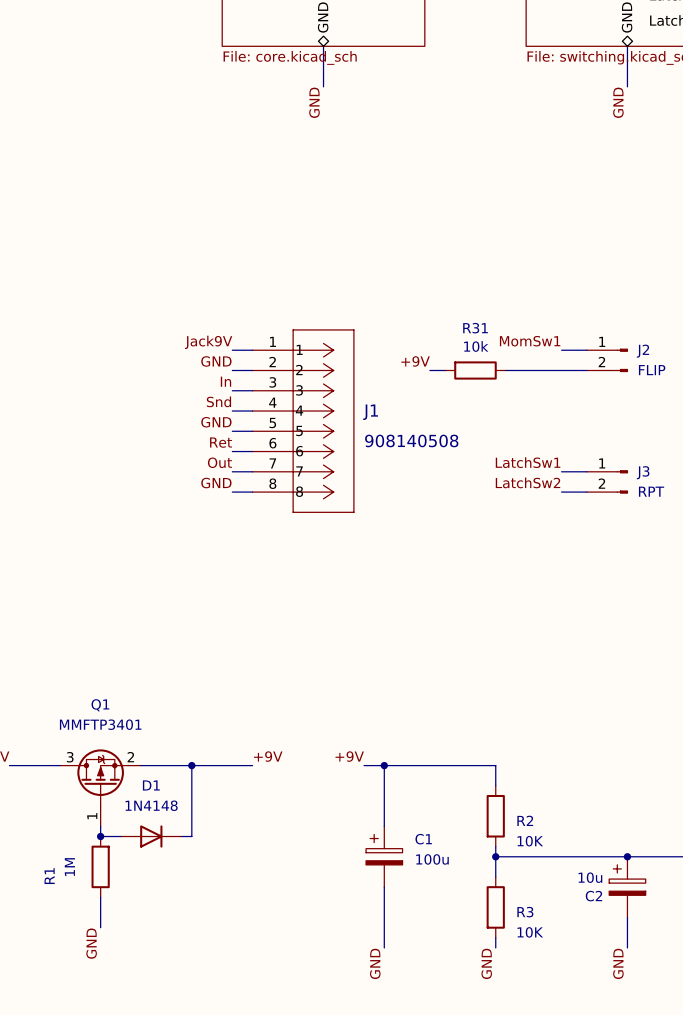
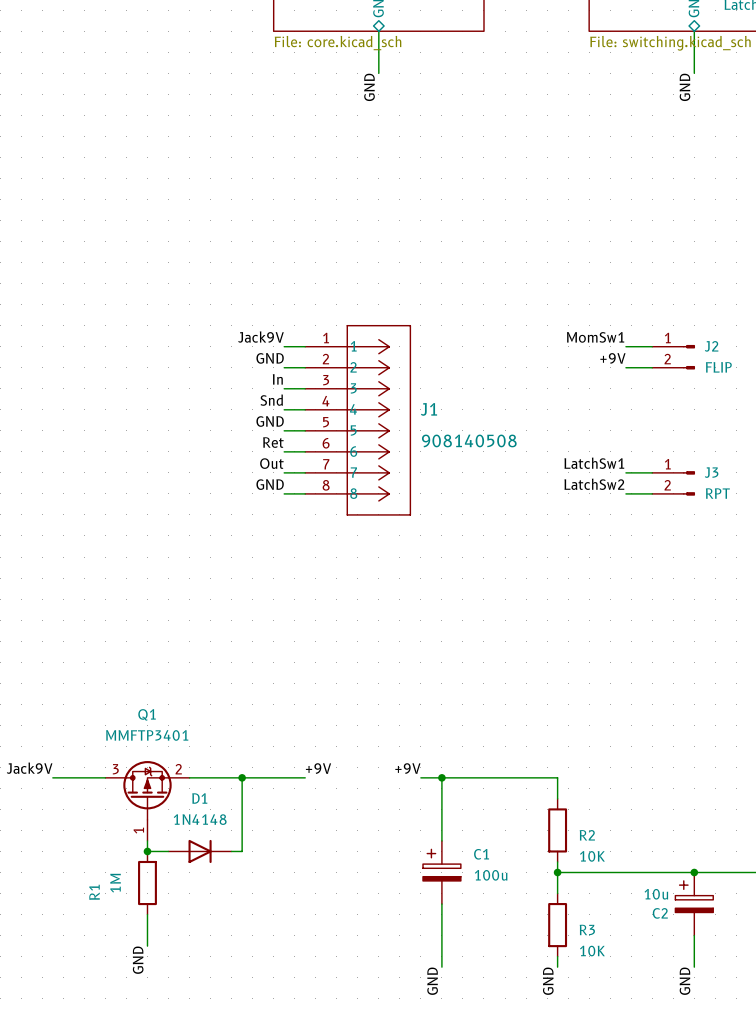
label position: +9V (415, 361) -> +9V (612, 358)
wire: (429, 370) (445, 370) -> none
R31: 10k (475, 370) -> none
wire: (505, 370) (561, 370) -> none

